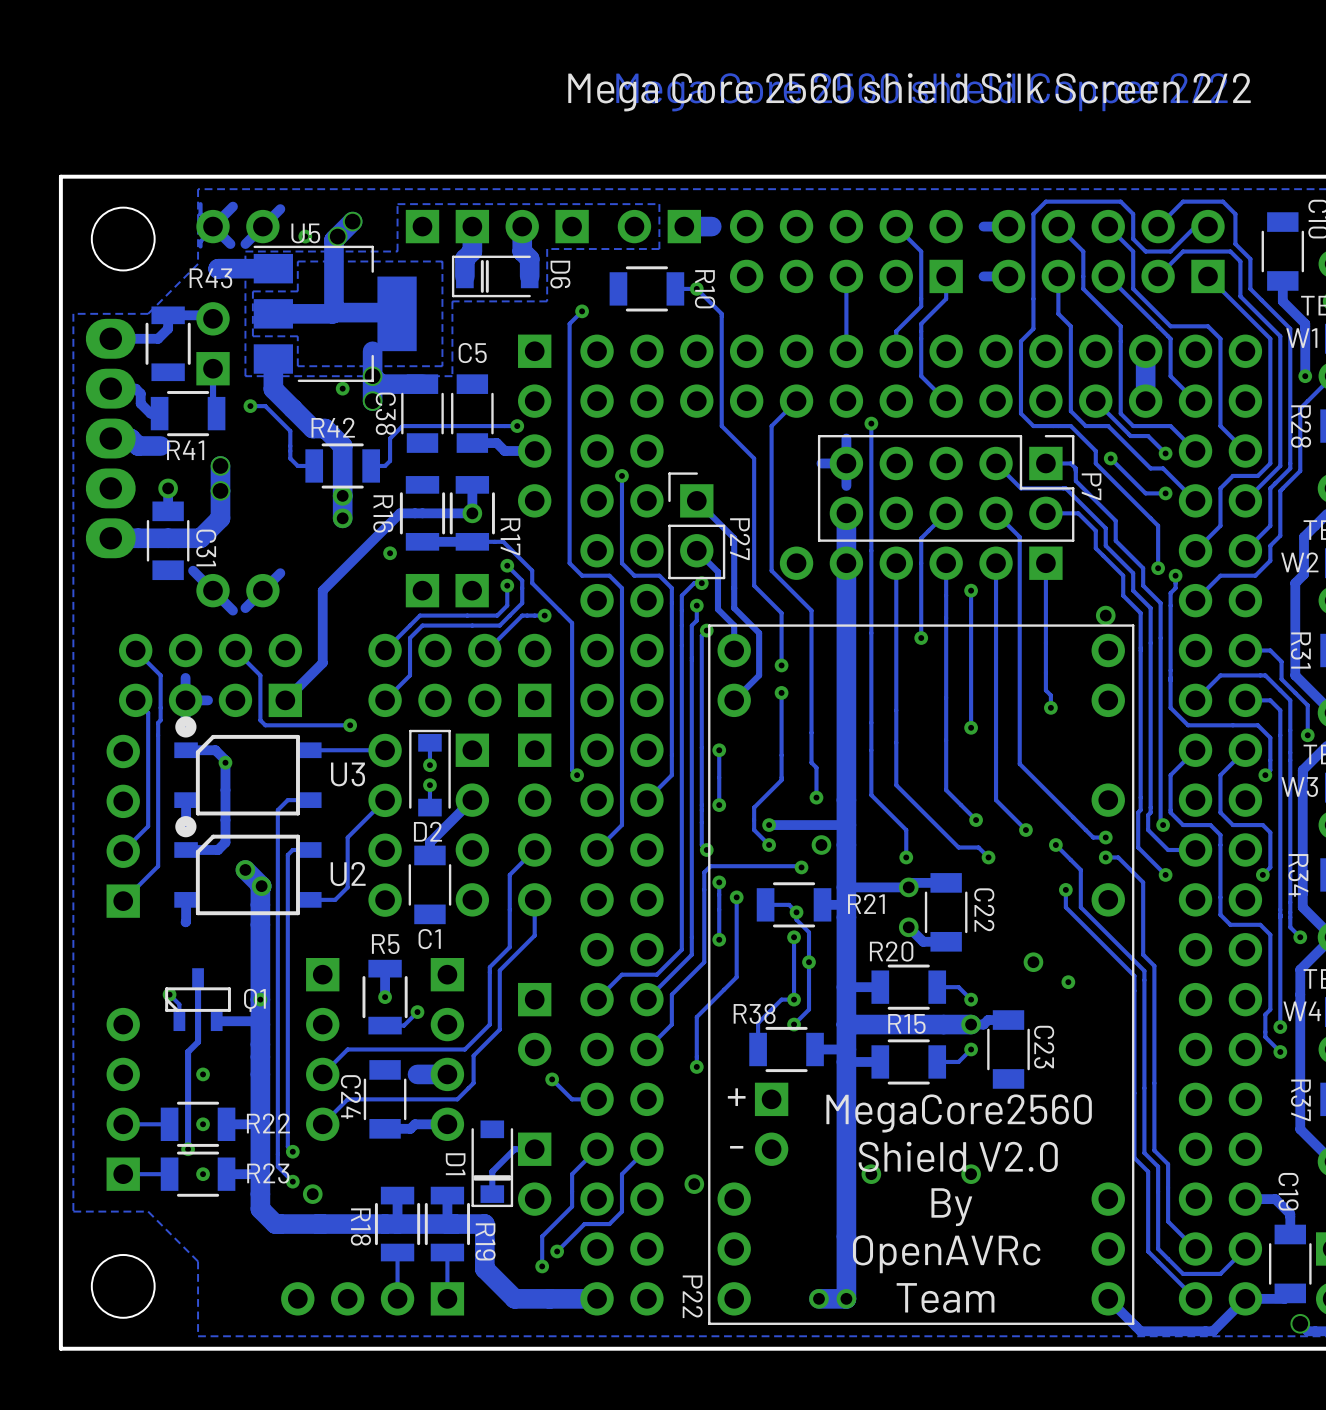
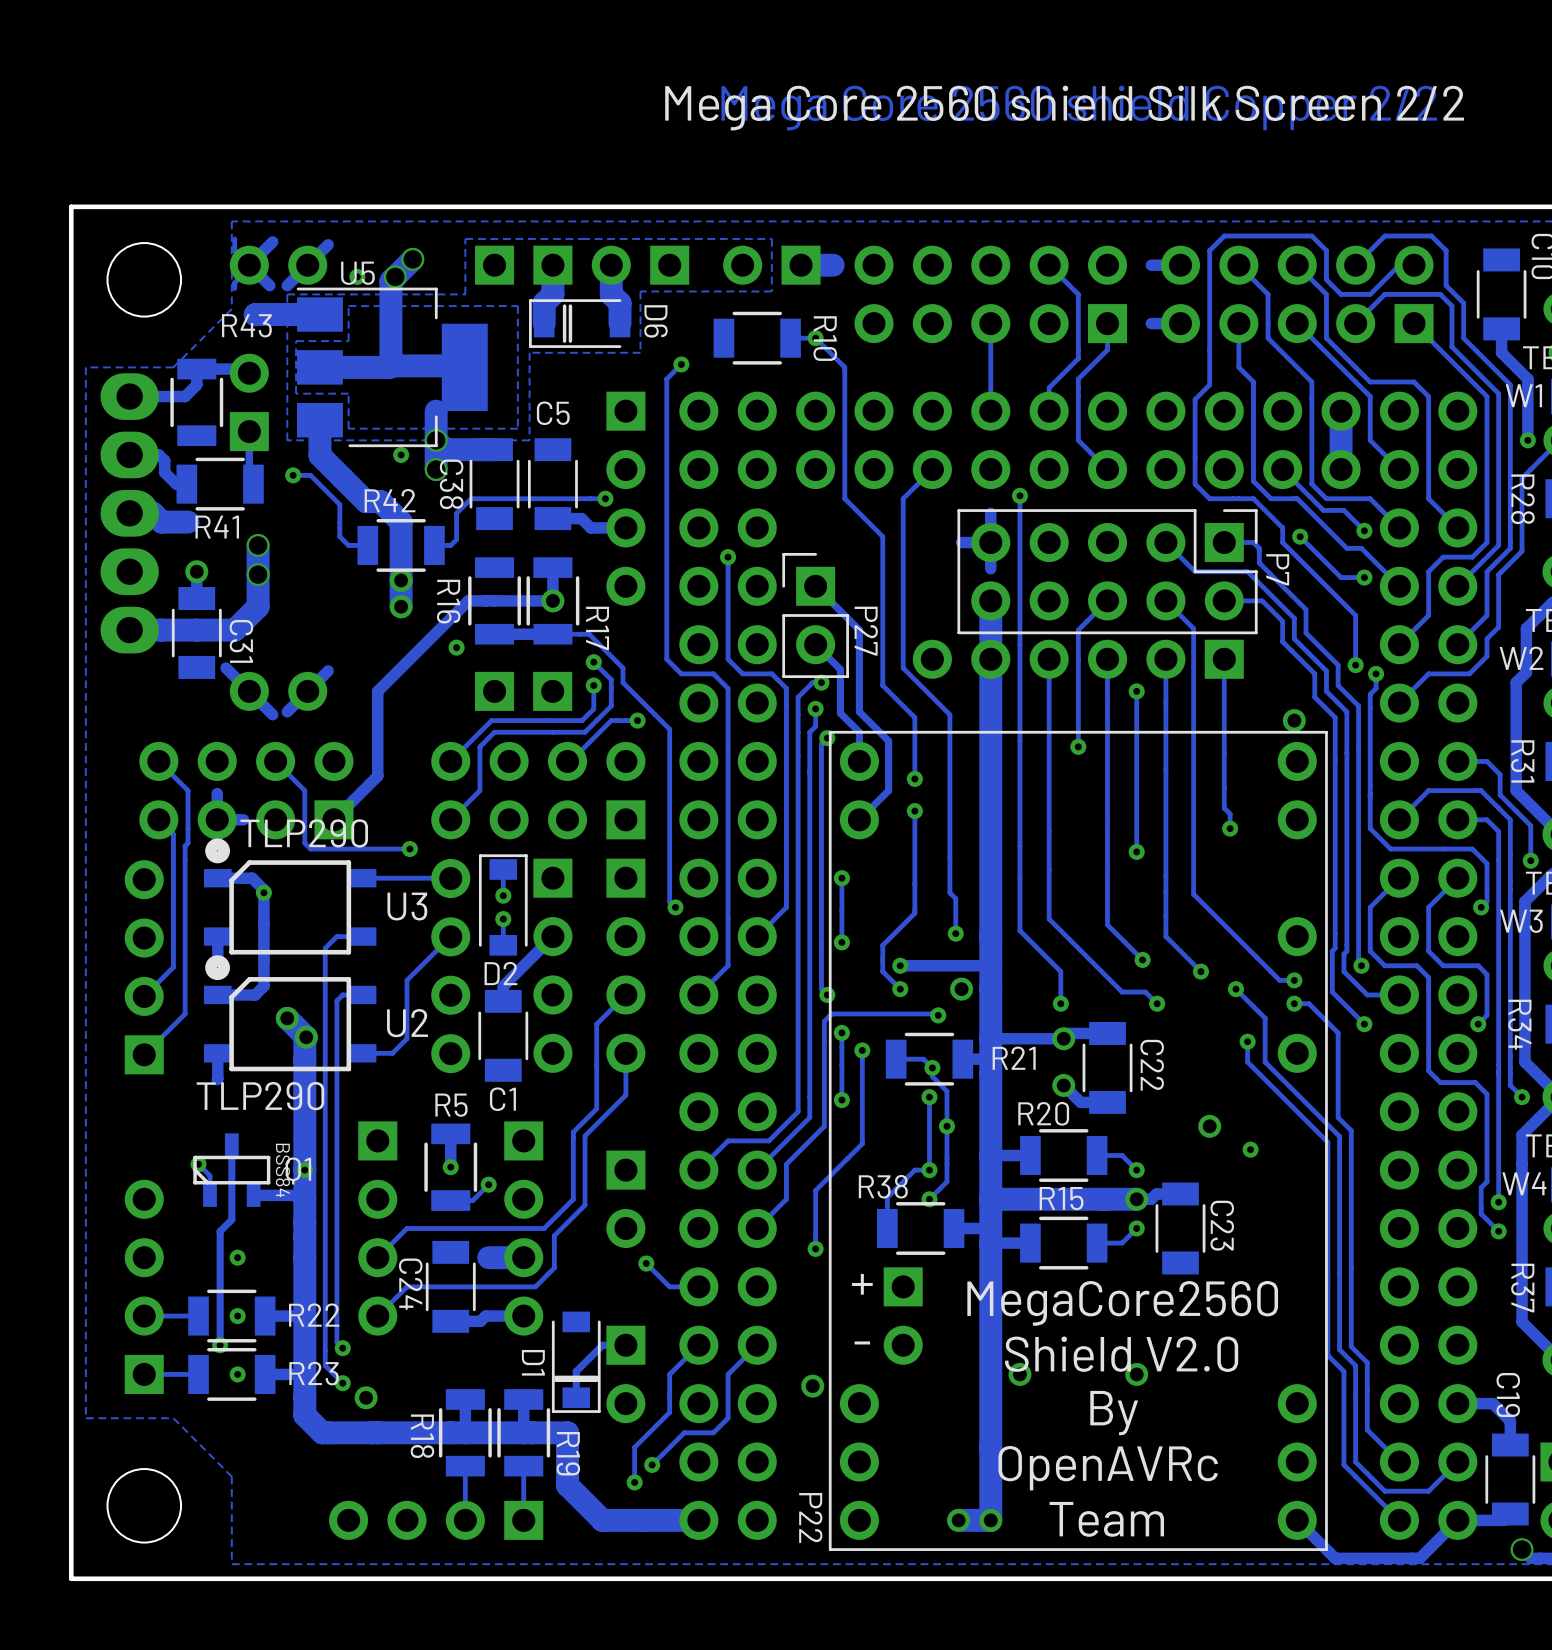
U3 value: none -> TLP290 (304, 833)
U2 value: none -> TLP290 (260, 1096)
Q1 value: none -> BSS84 (282, 1170)

